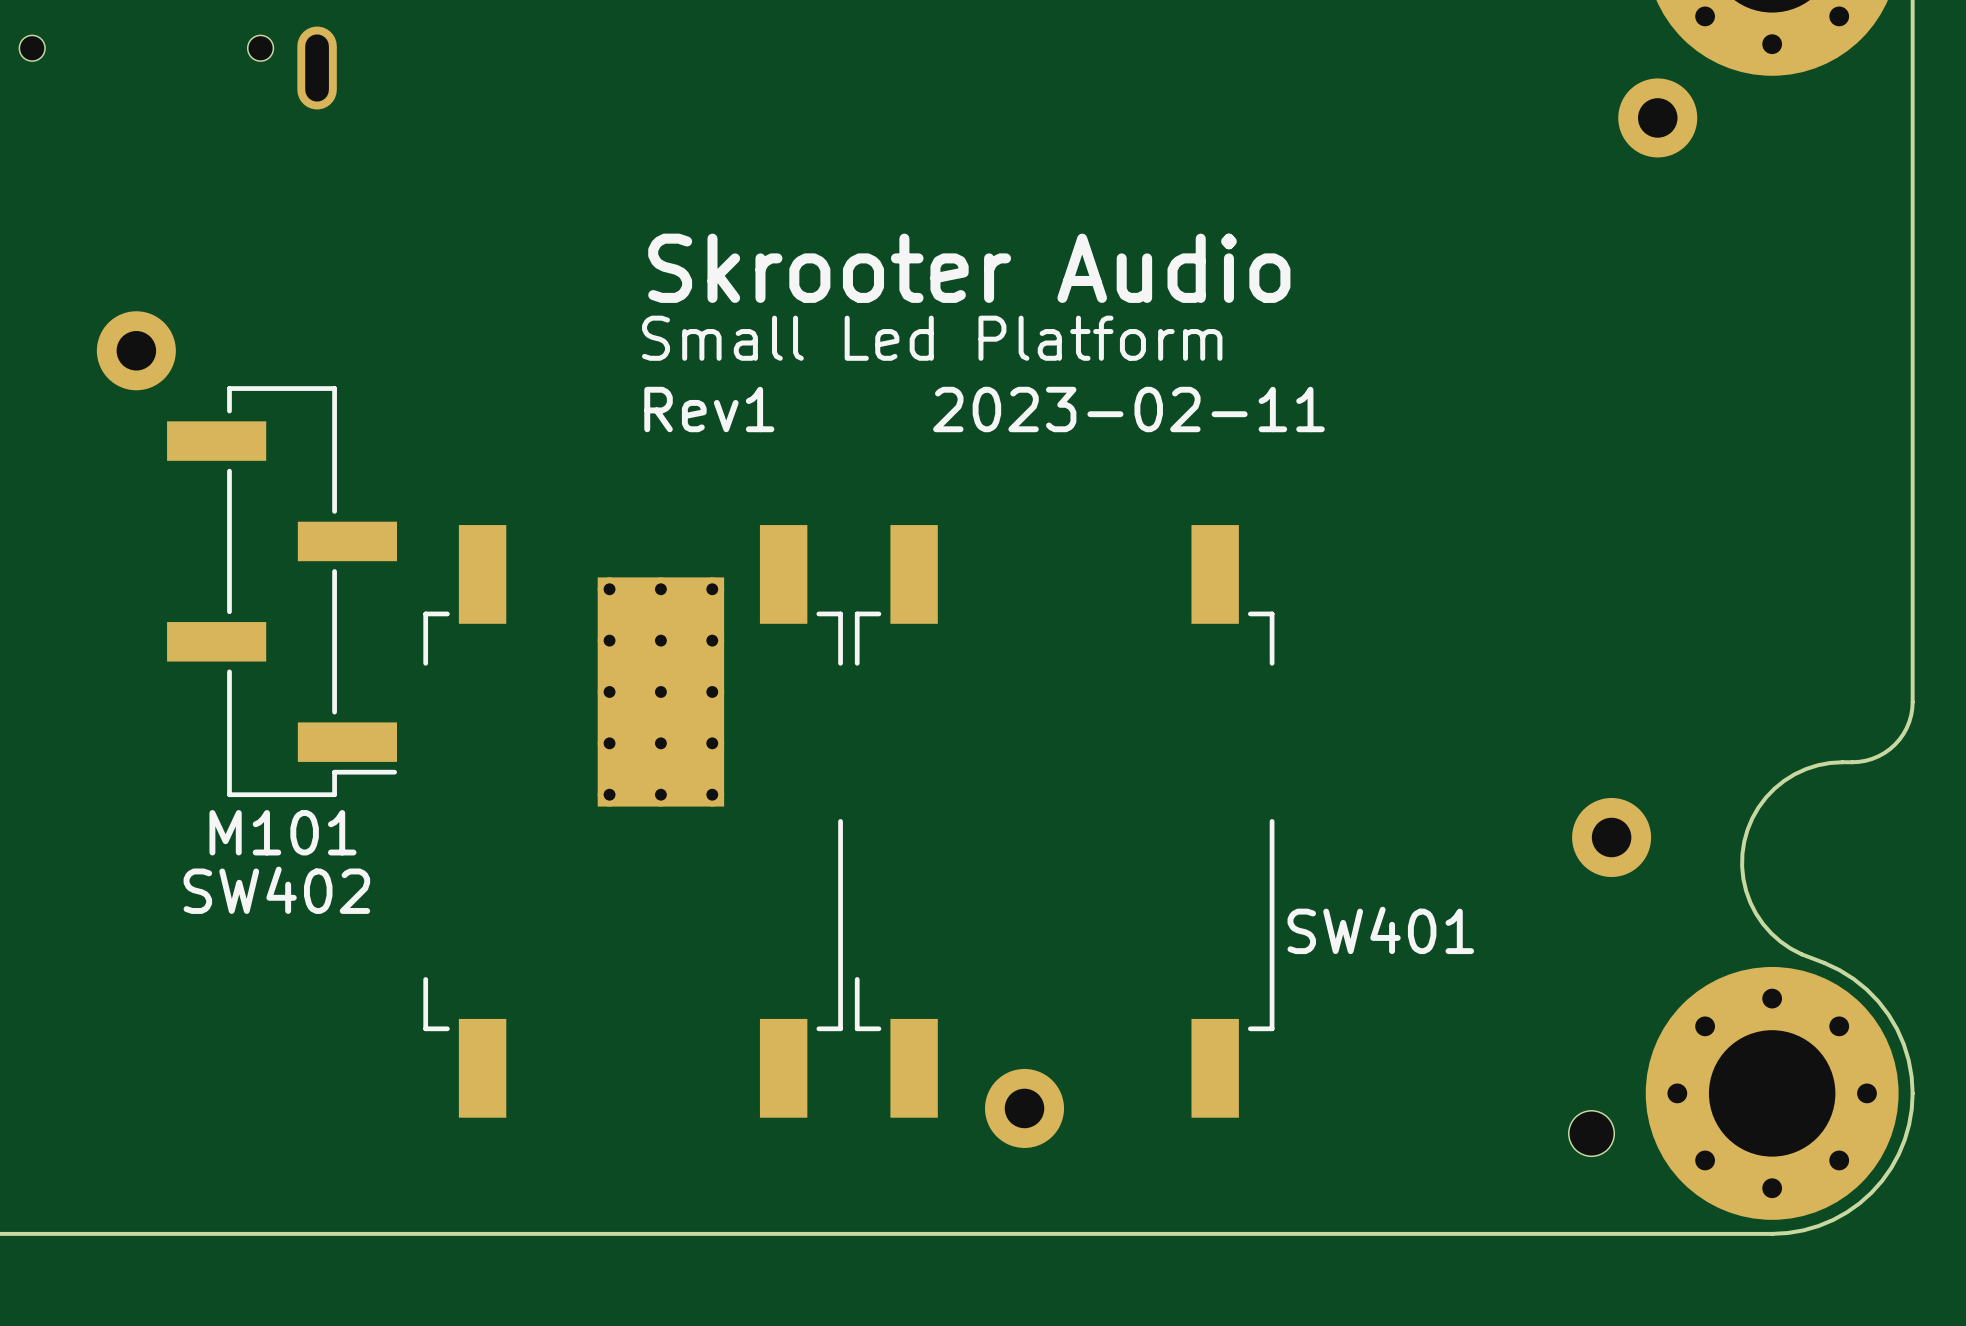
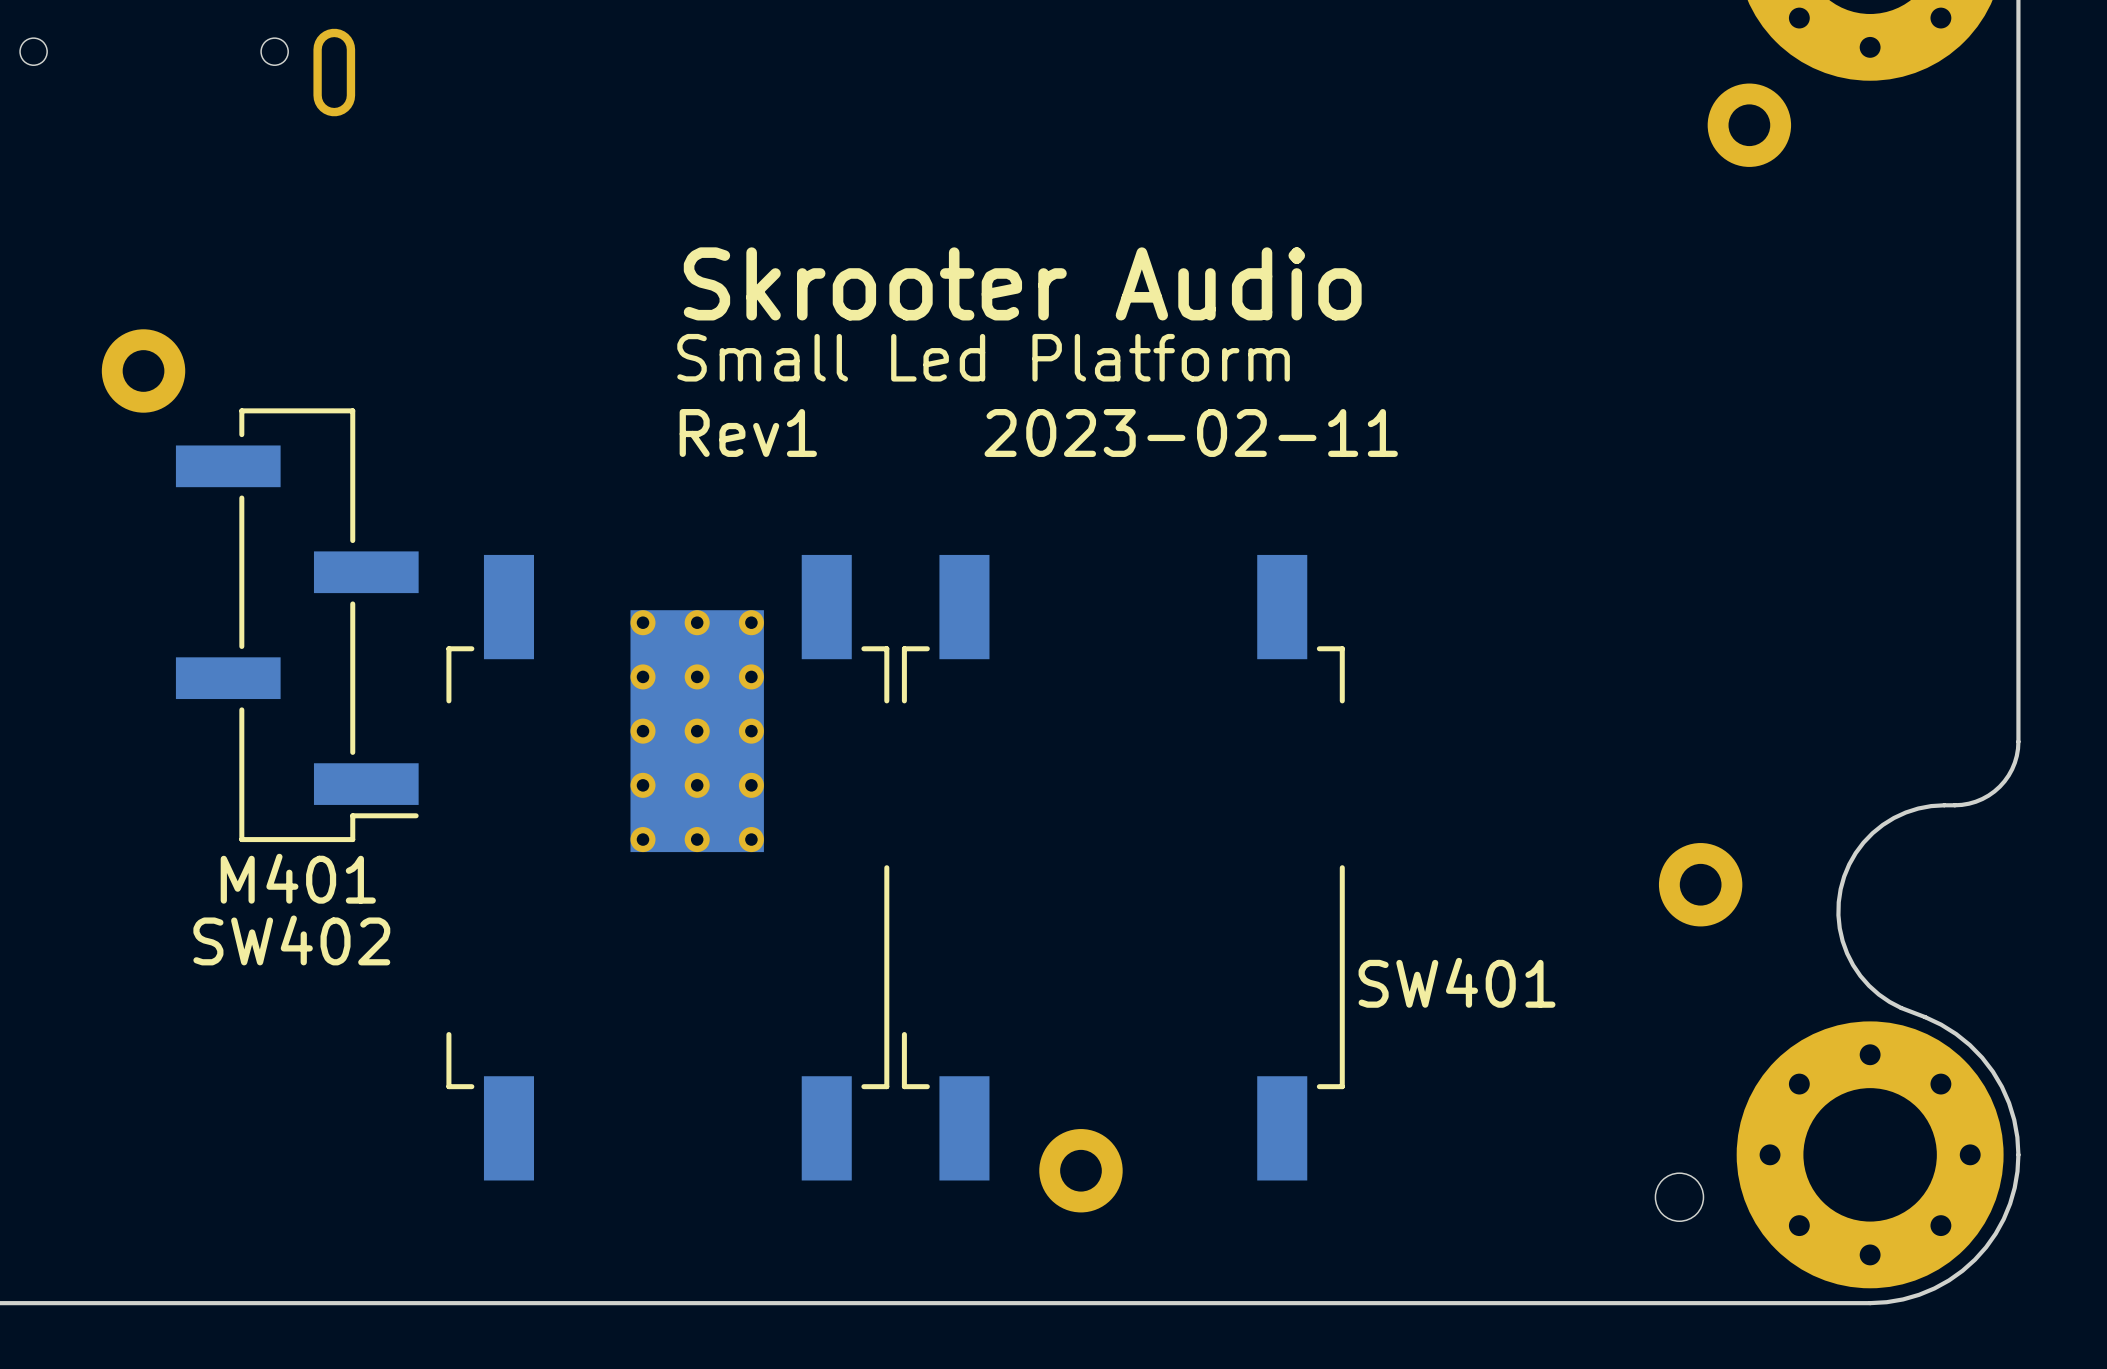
M101 name: M101 (282, 832) -> M401 (298, 878)

